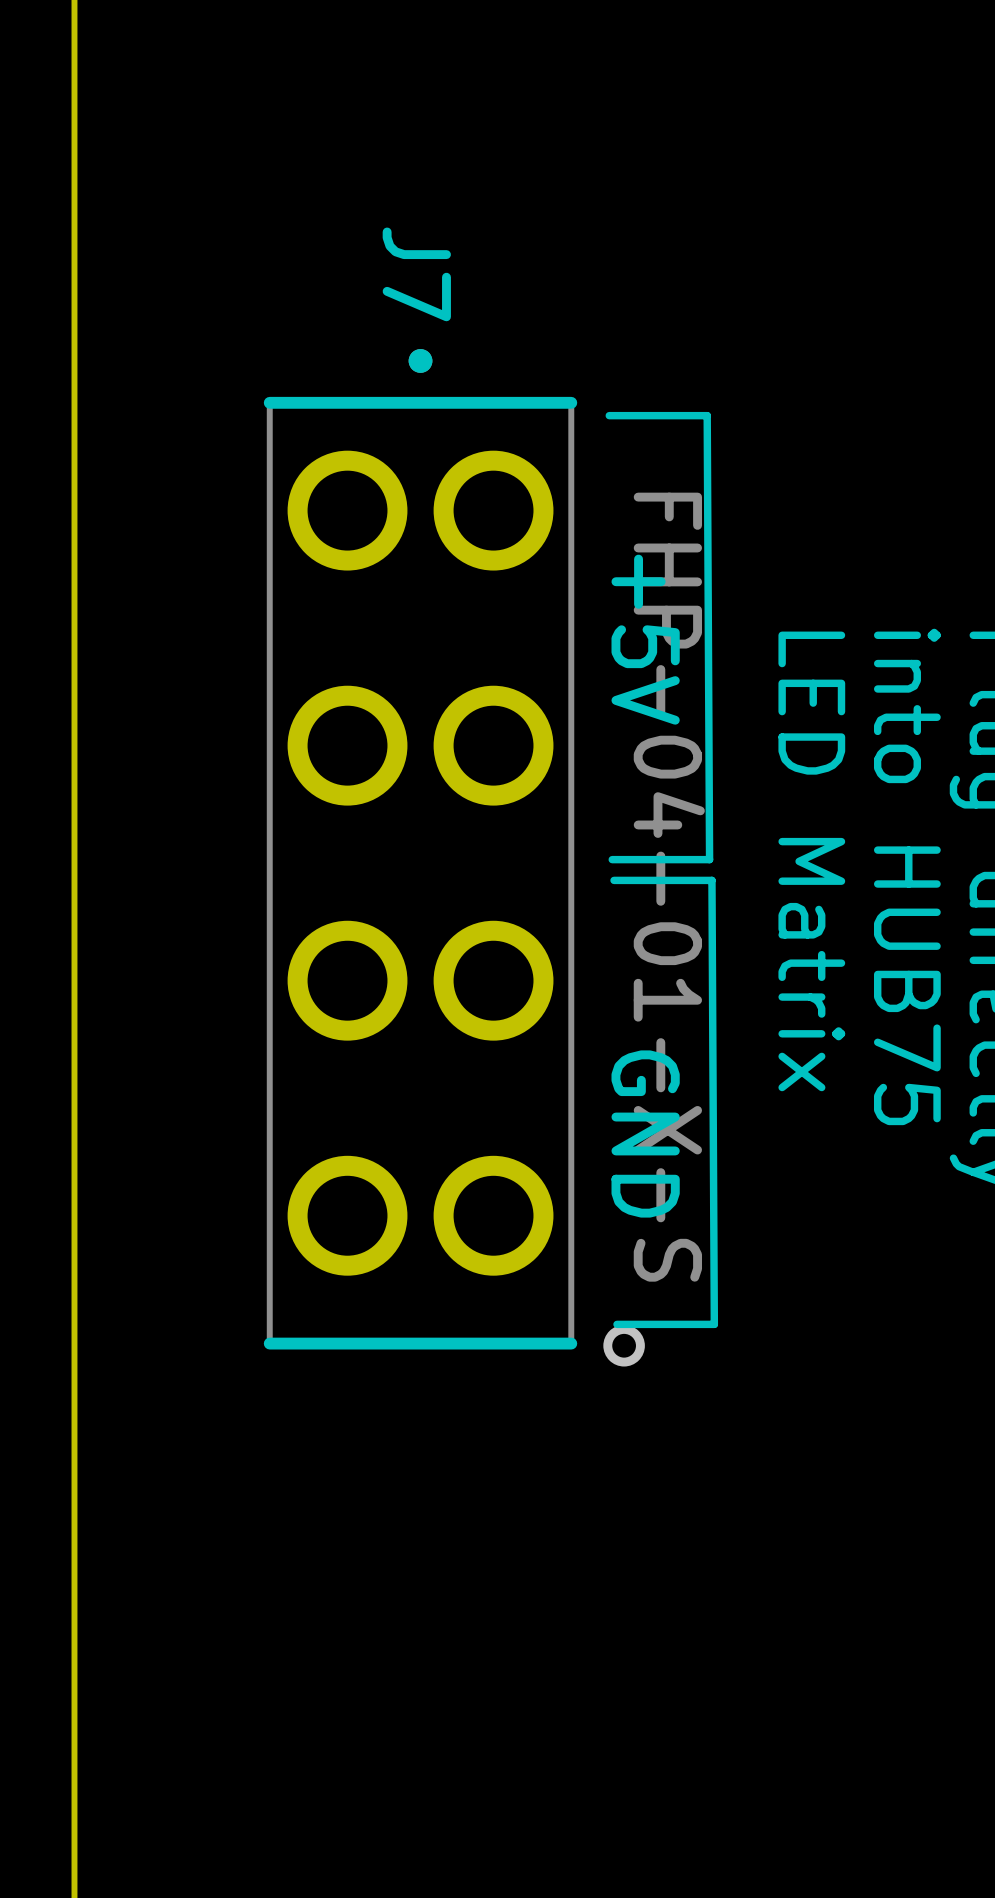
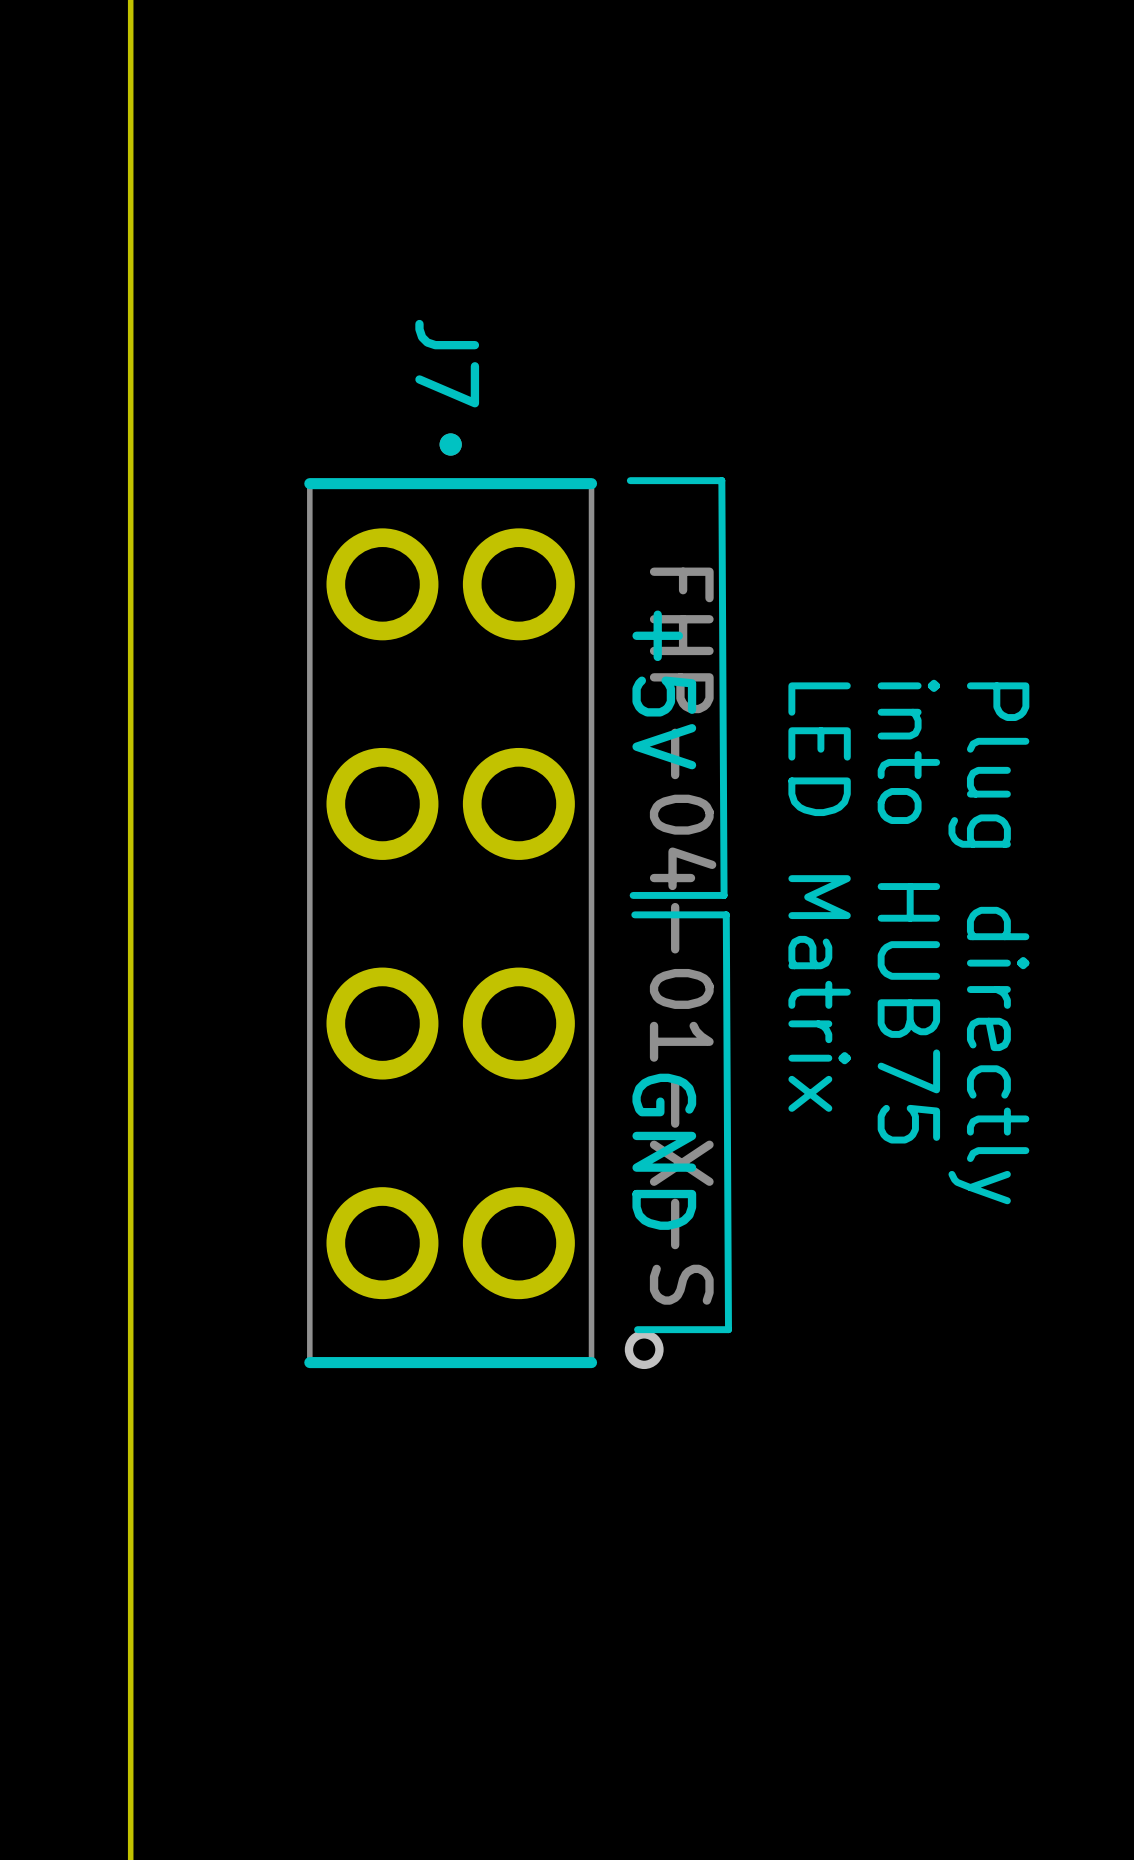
J7 position: (420, 849) -> (450, 900)

